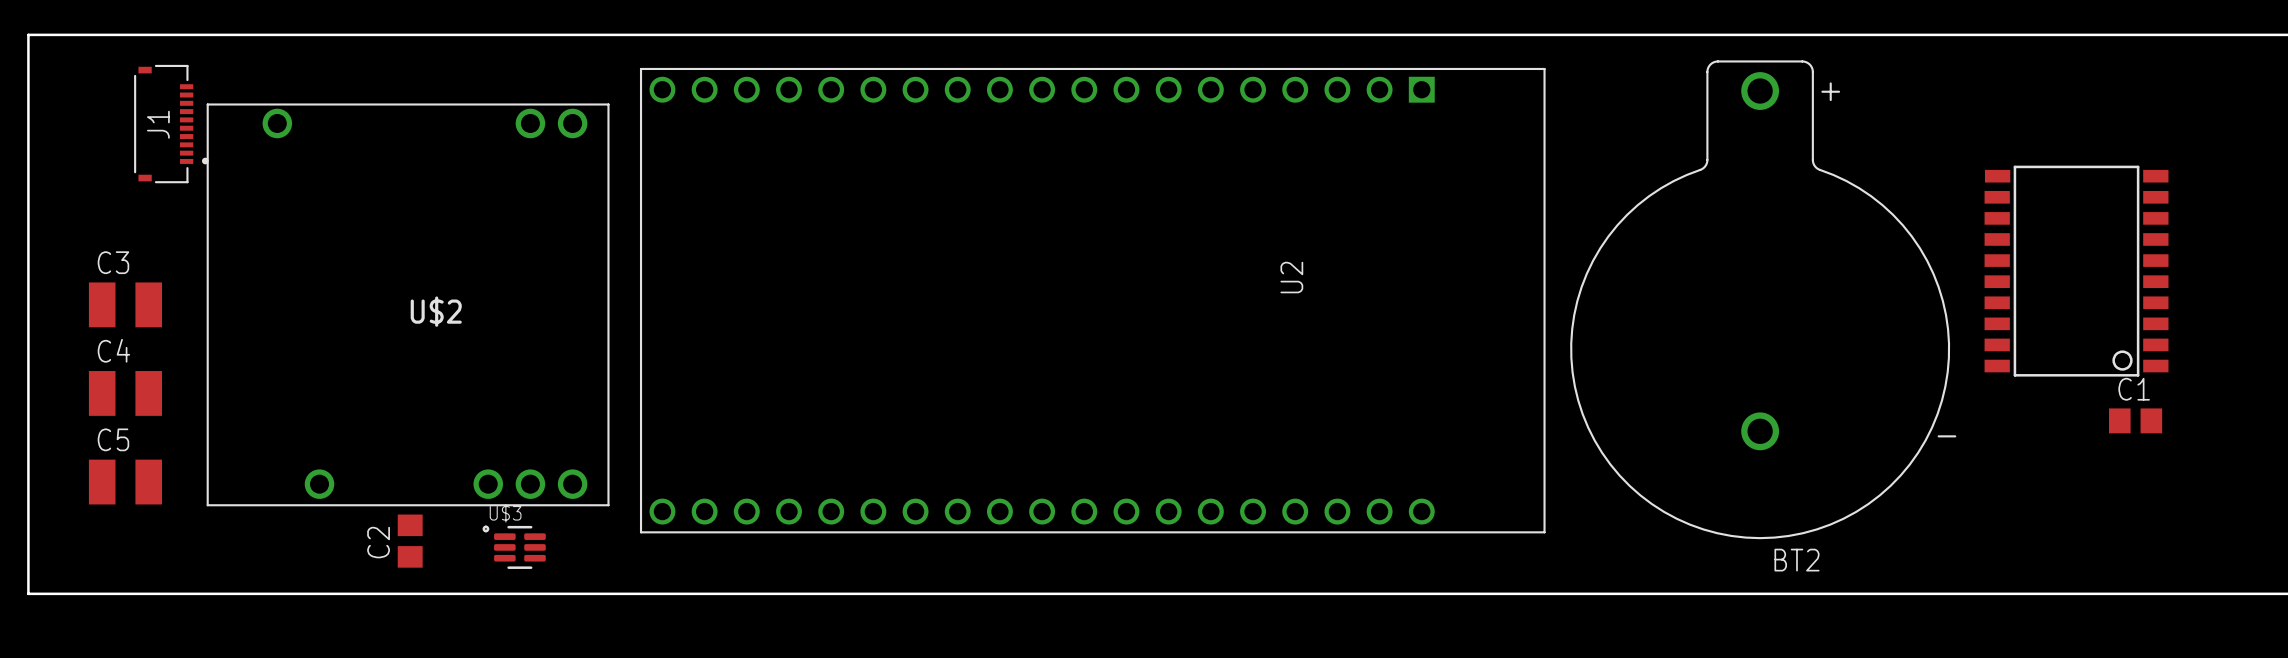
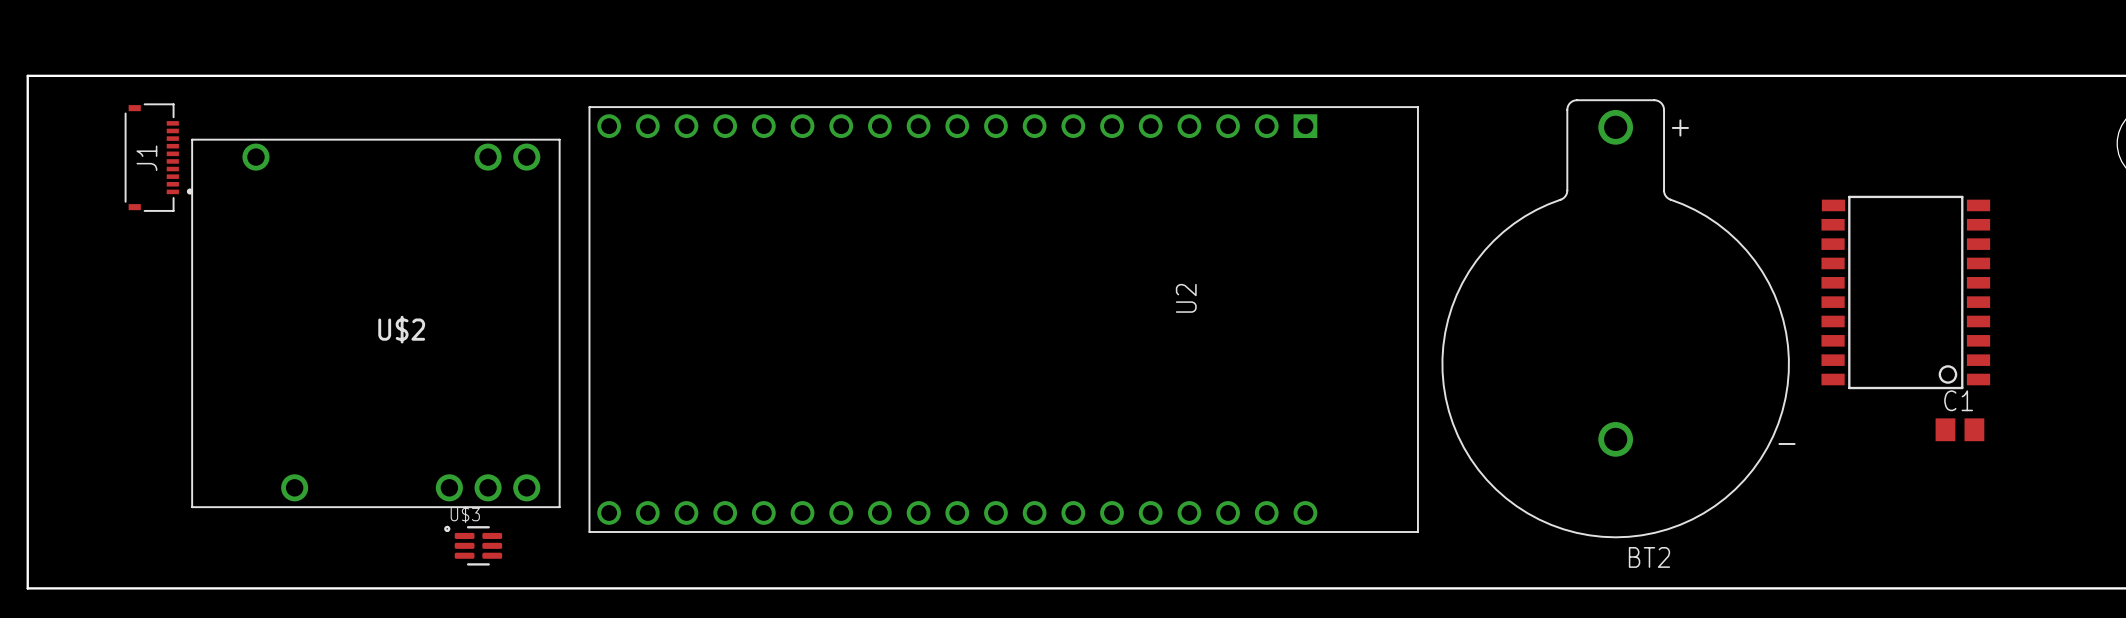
C3: (125, 304) -> none
C4: (125, 393) -> none
C5: (125, 482) -> none
C2: (410, 541) -> none

